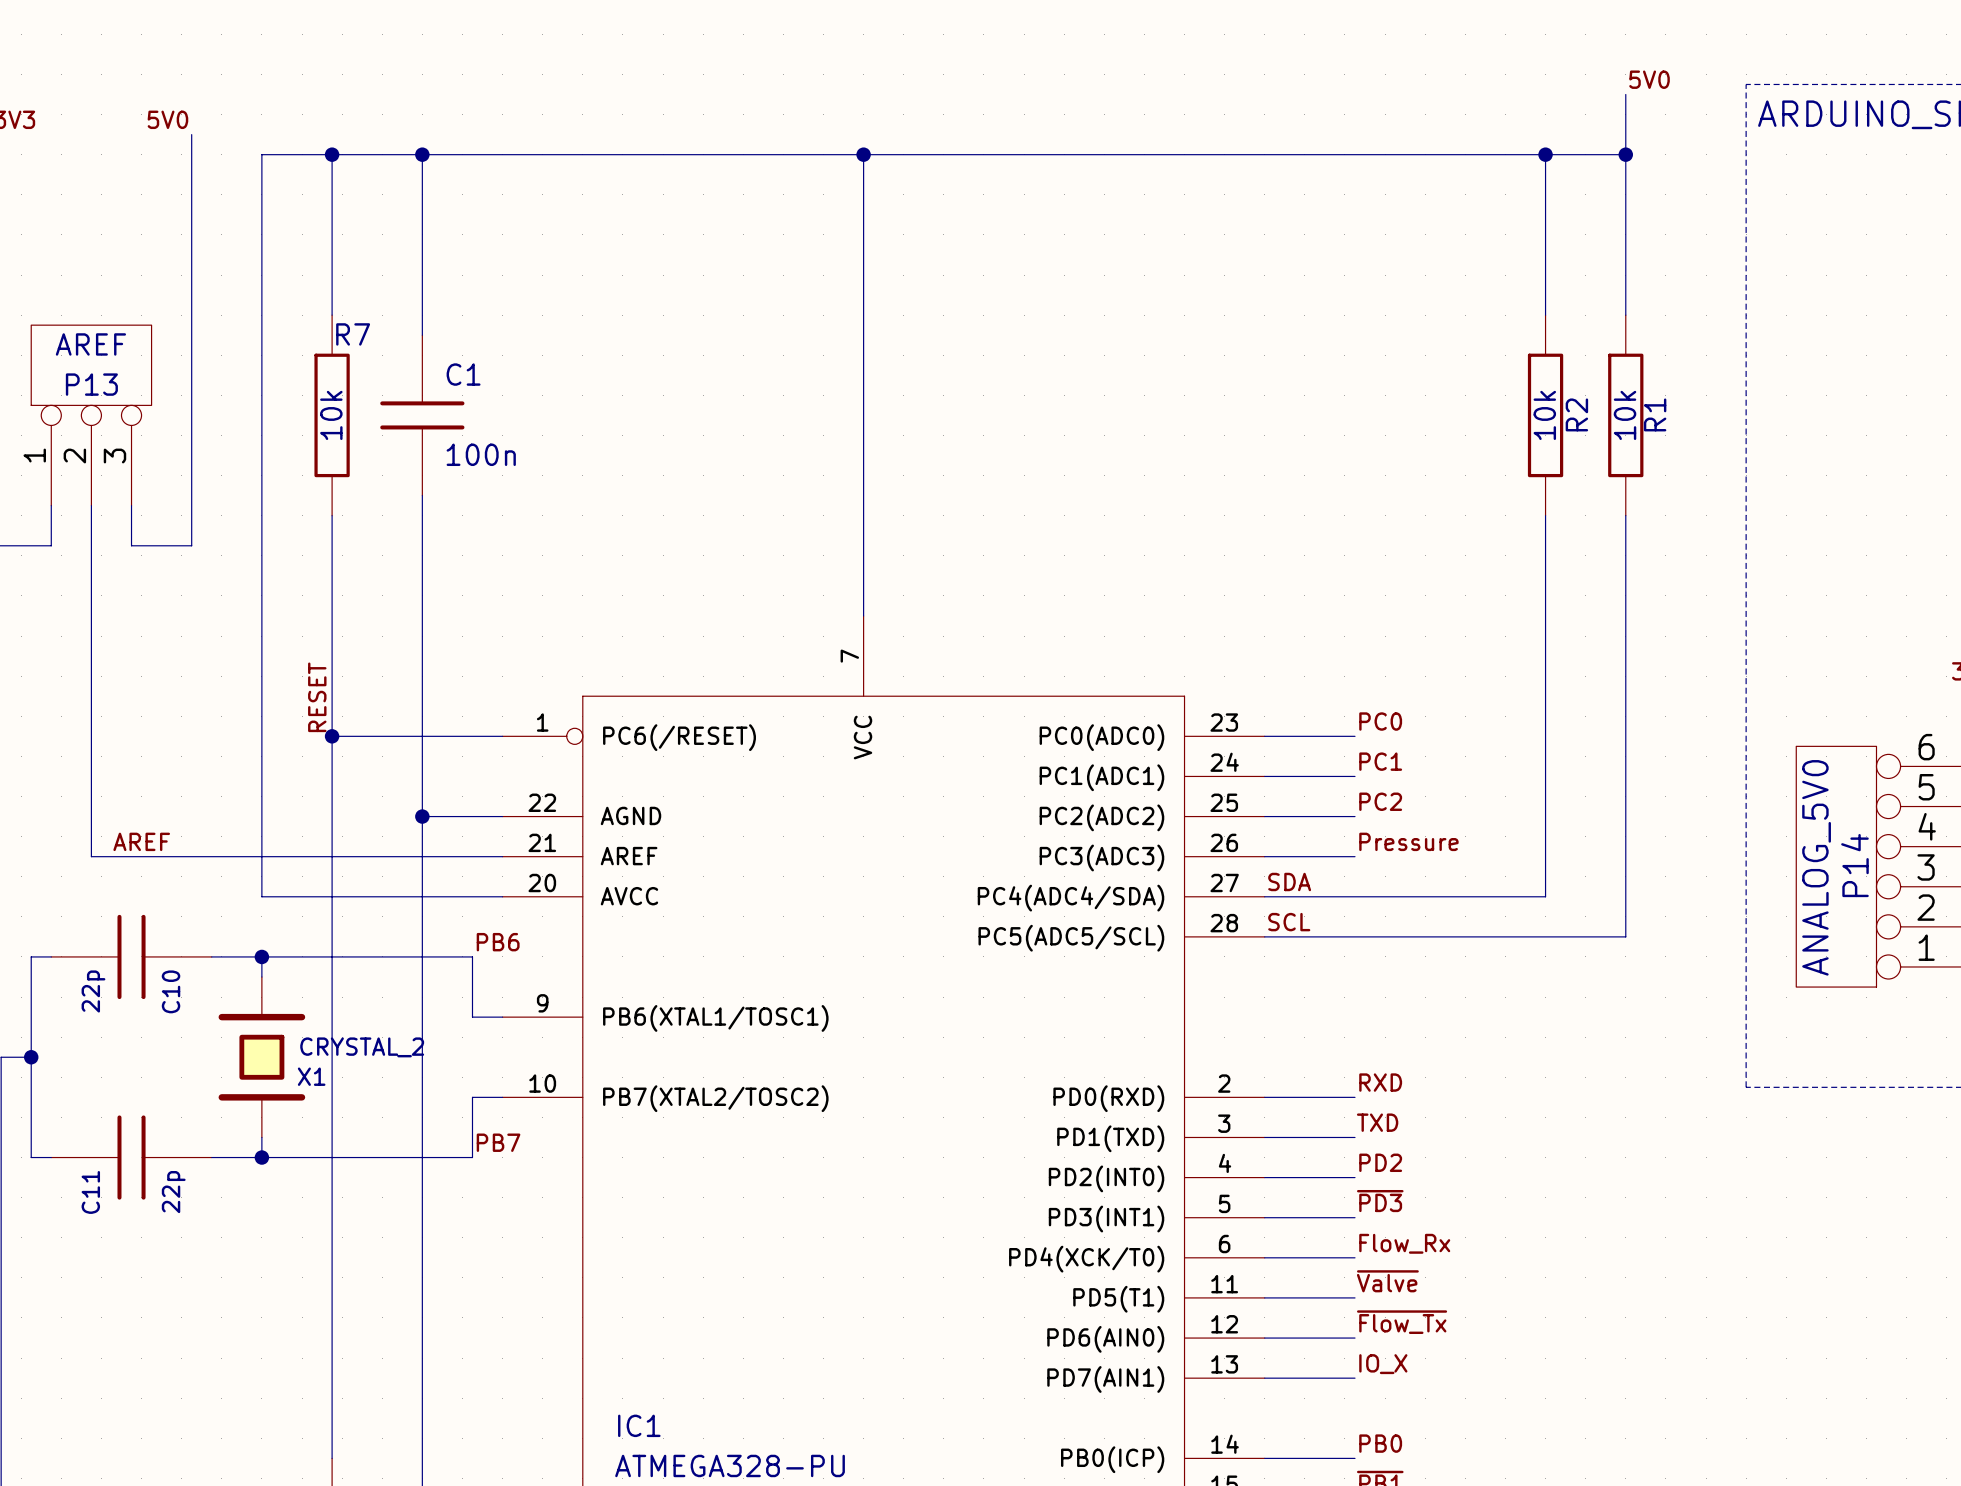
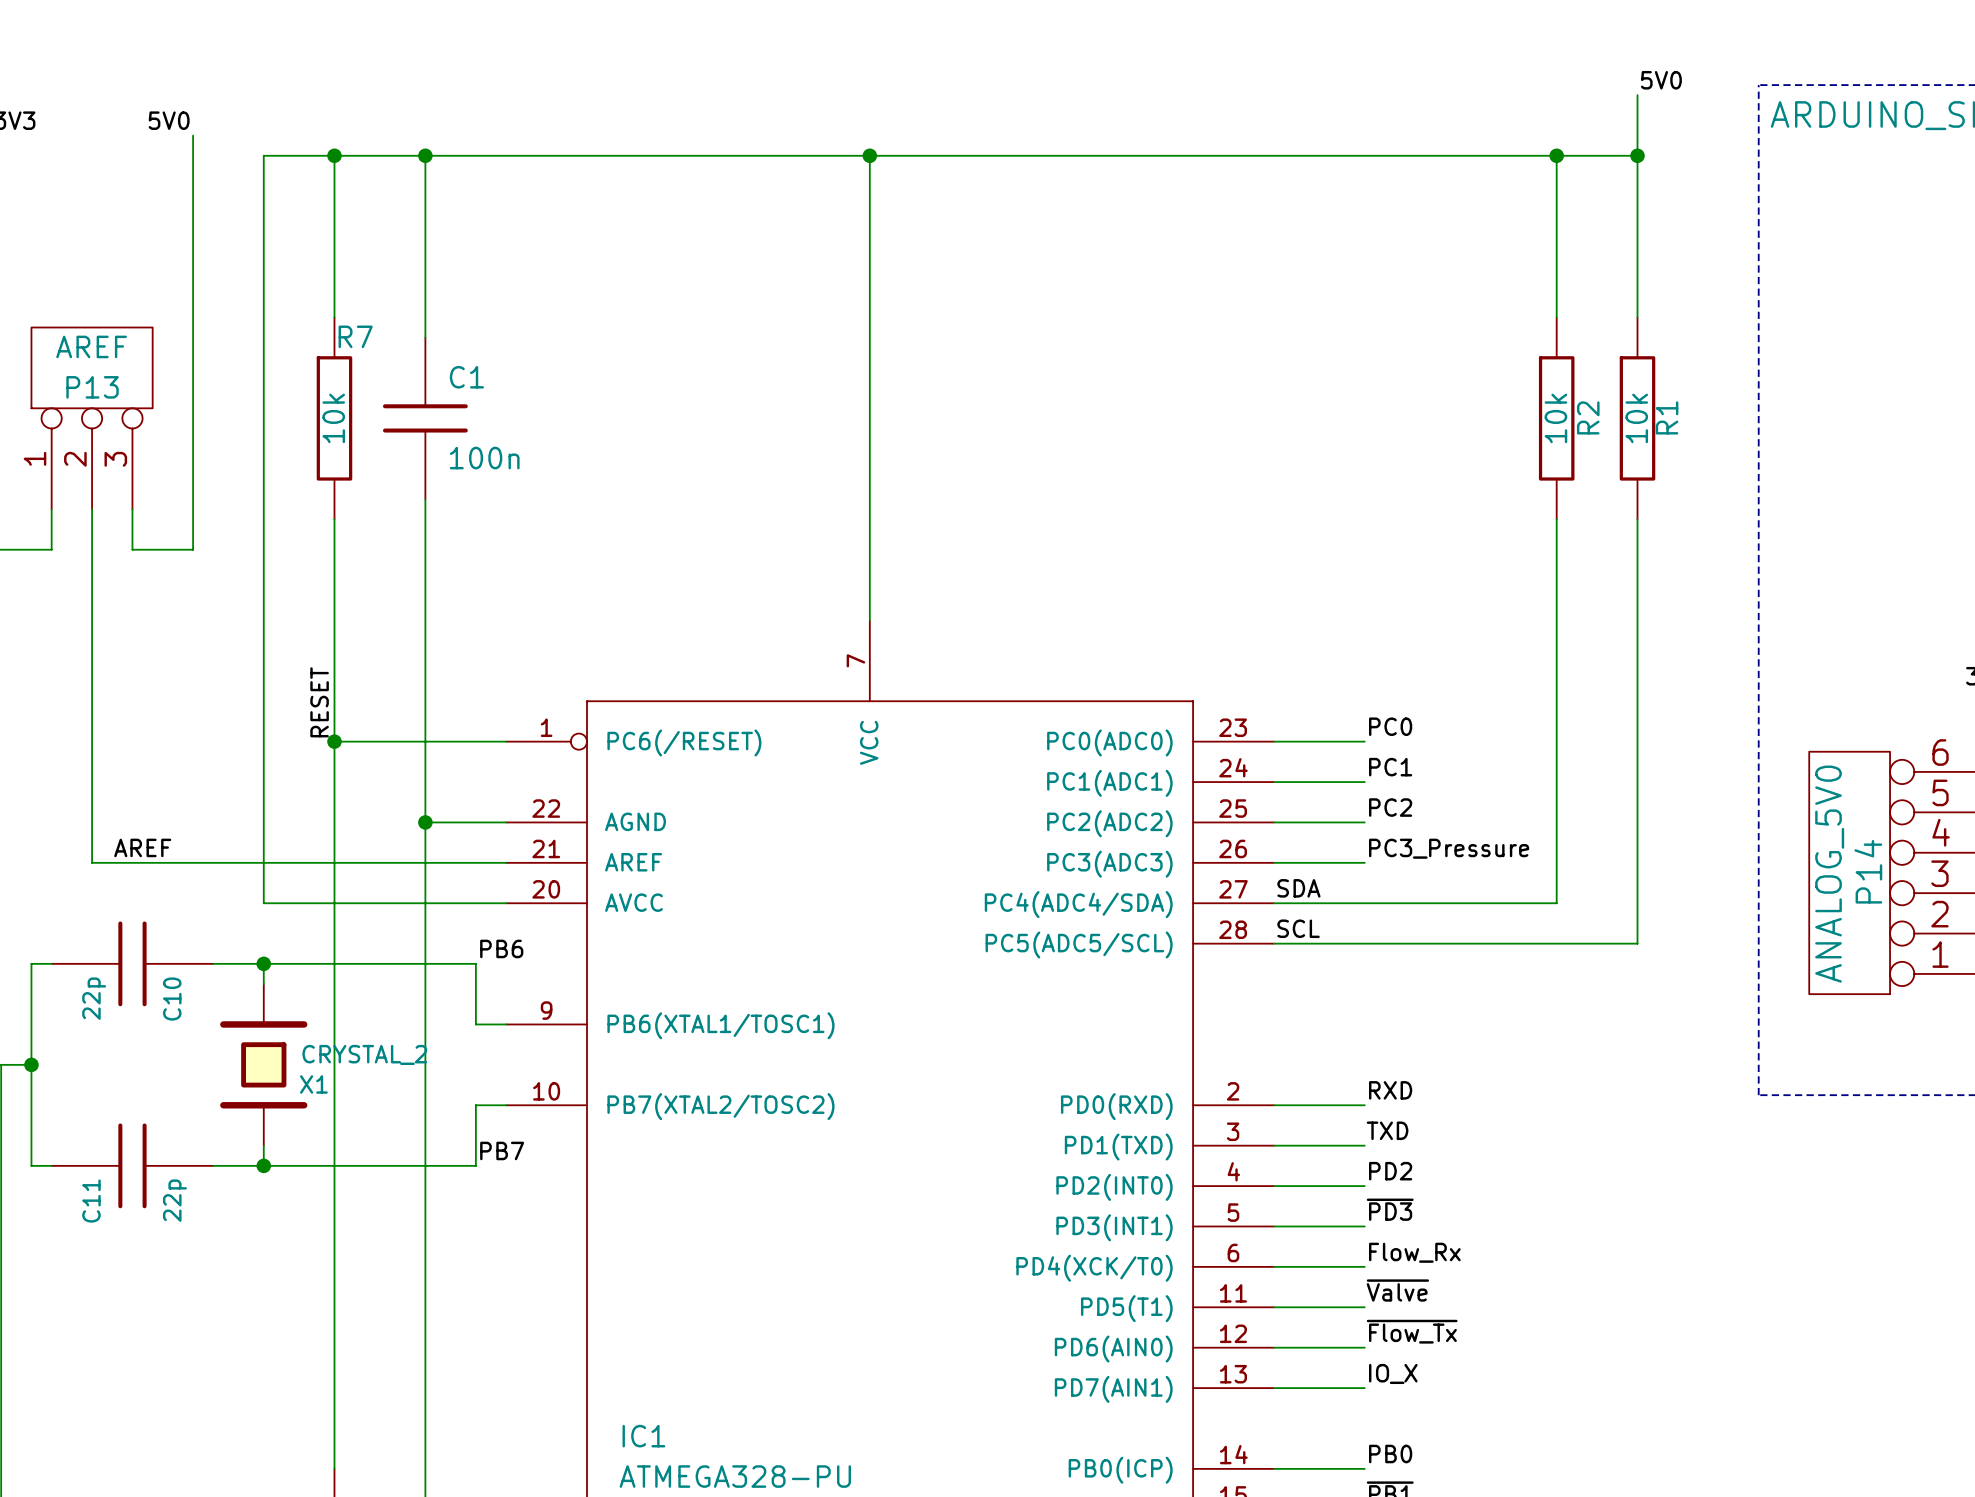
label: Pressure (1408, 841) -> PC3_Pressure (1449, 848)

